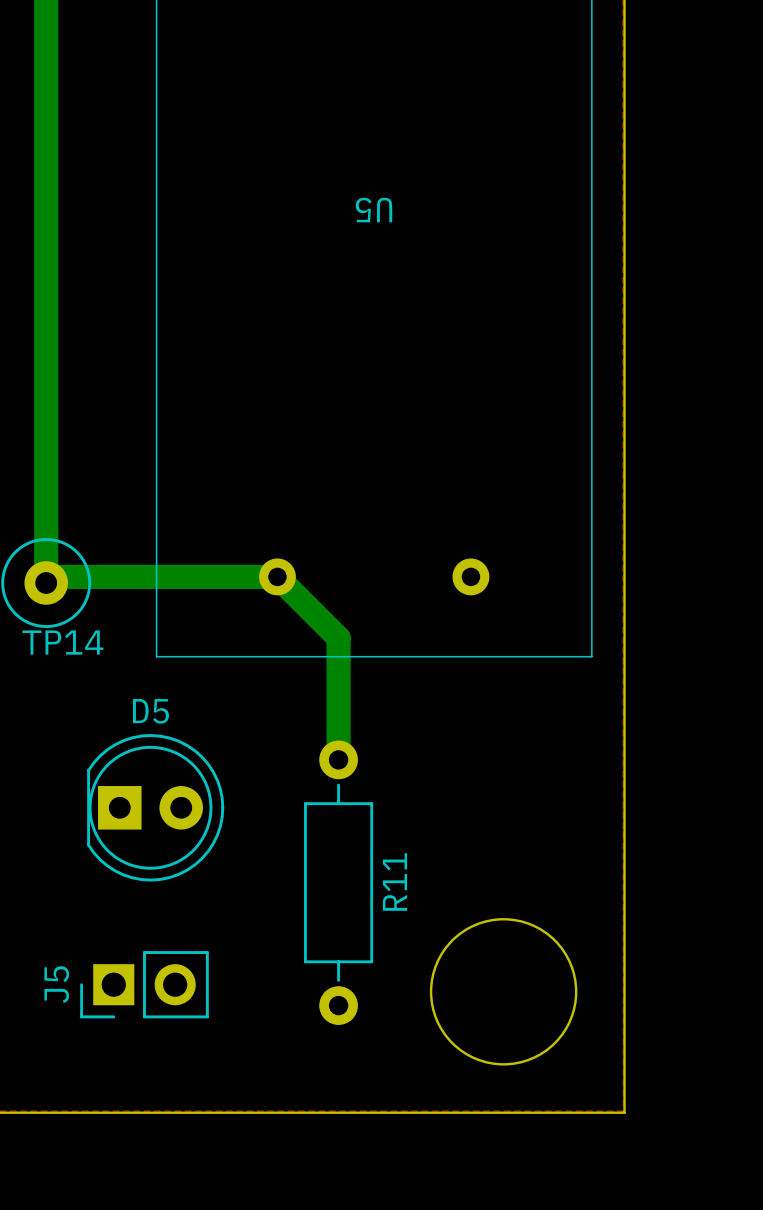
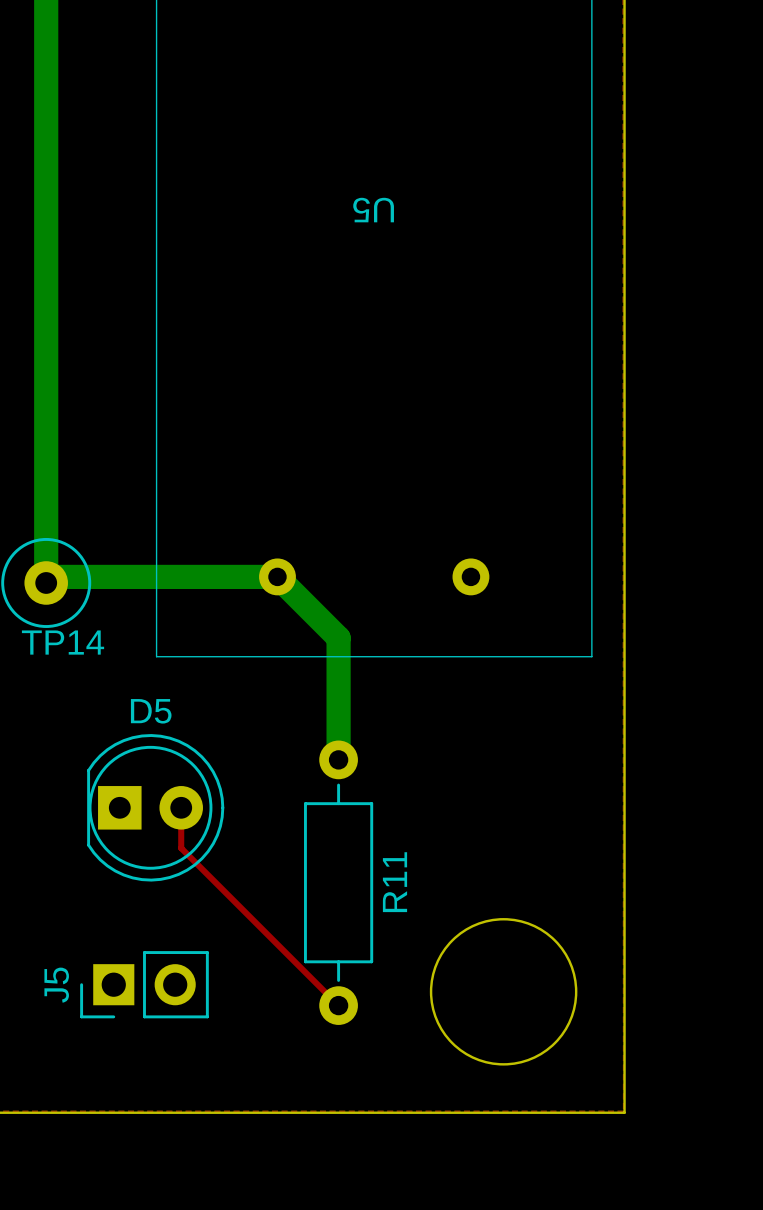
top track: none -> (181, 807) (181, 848) (338, 1005)

